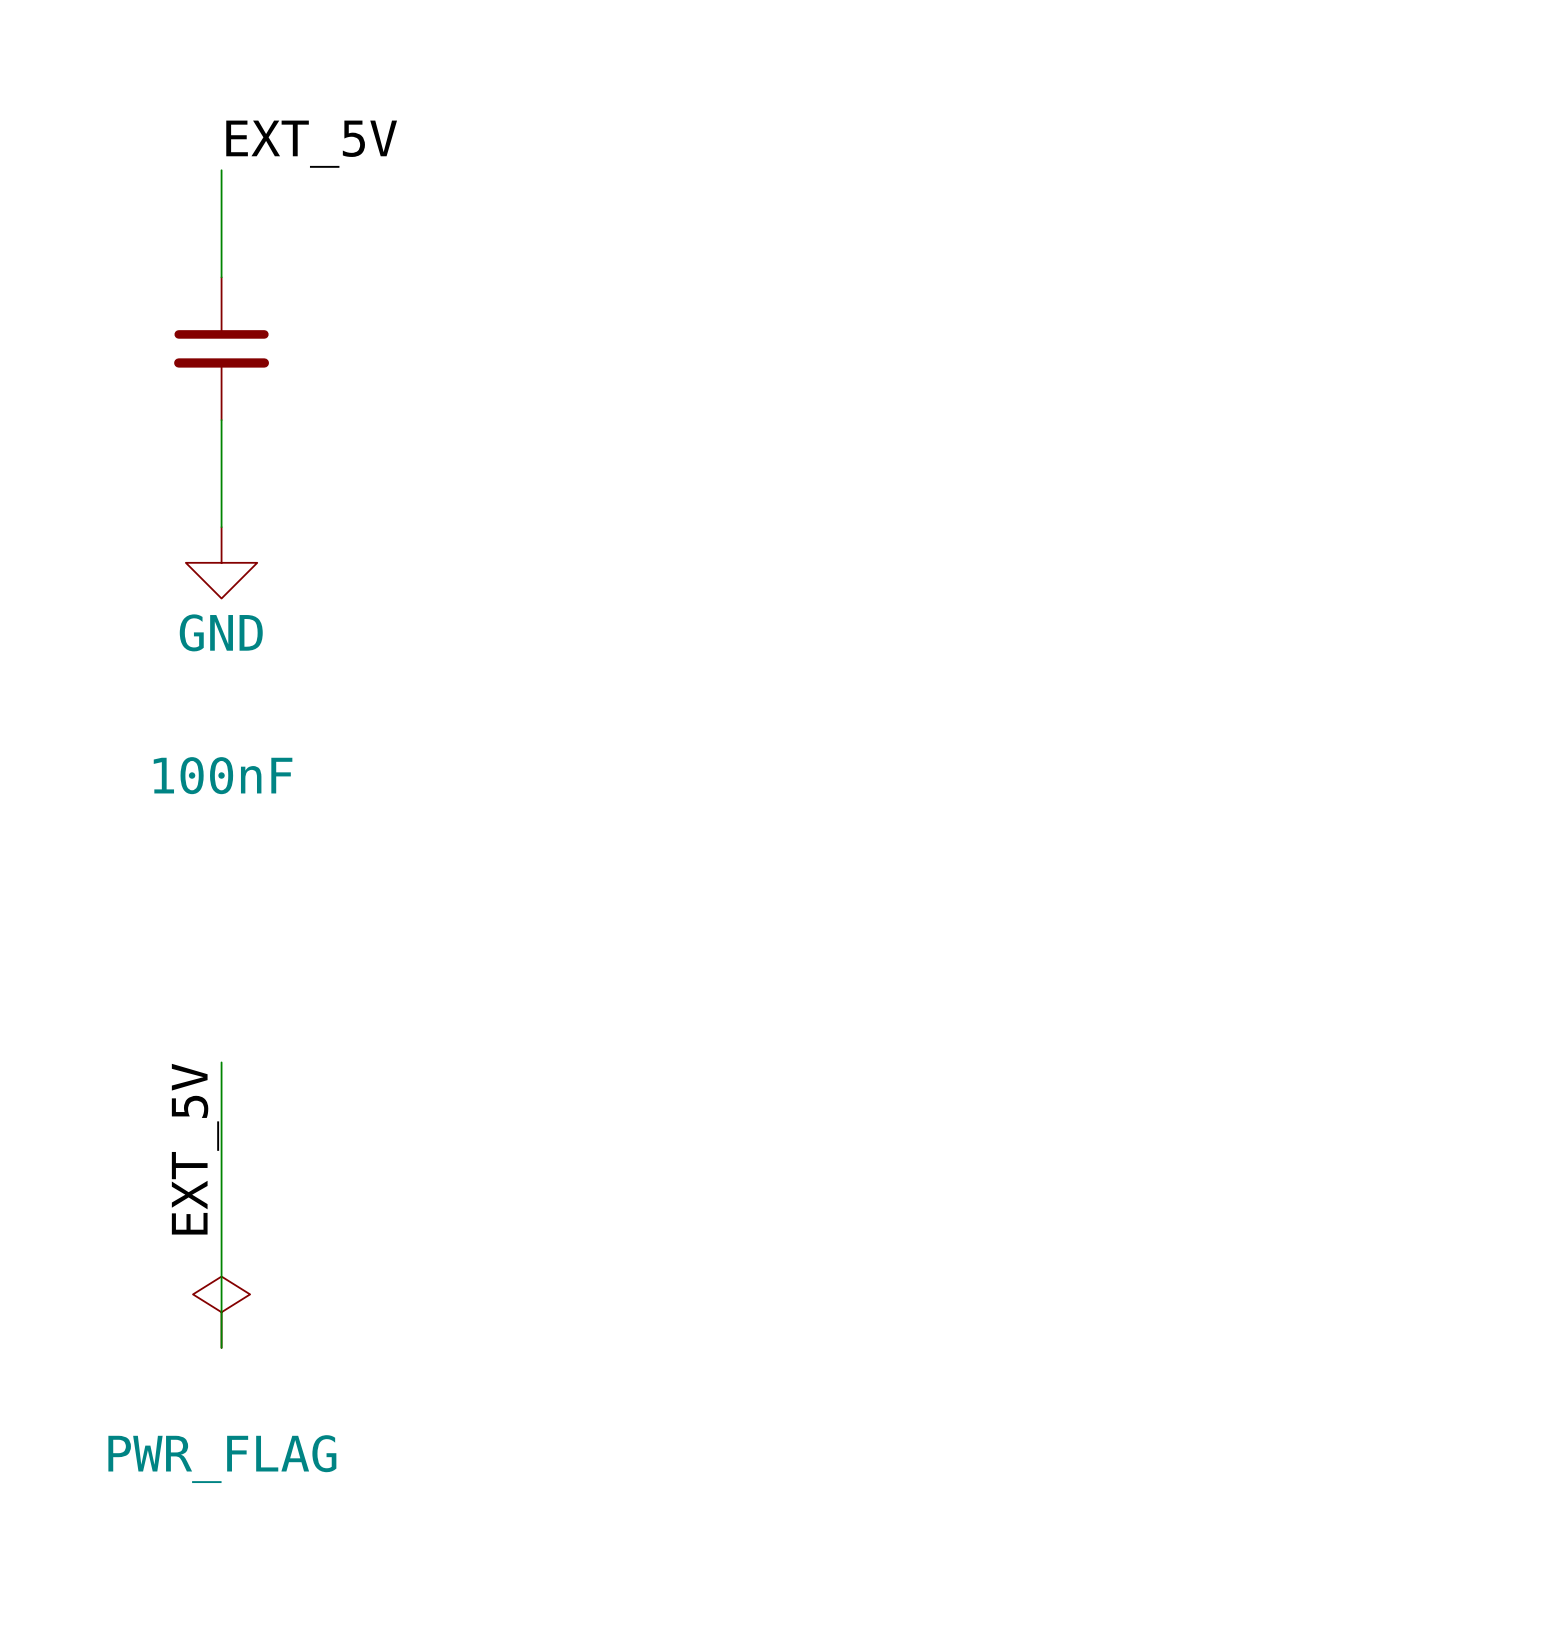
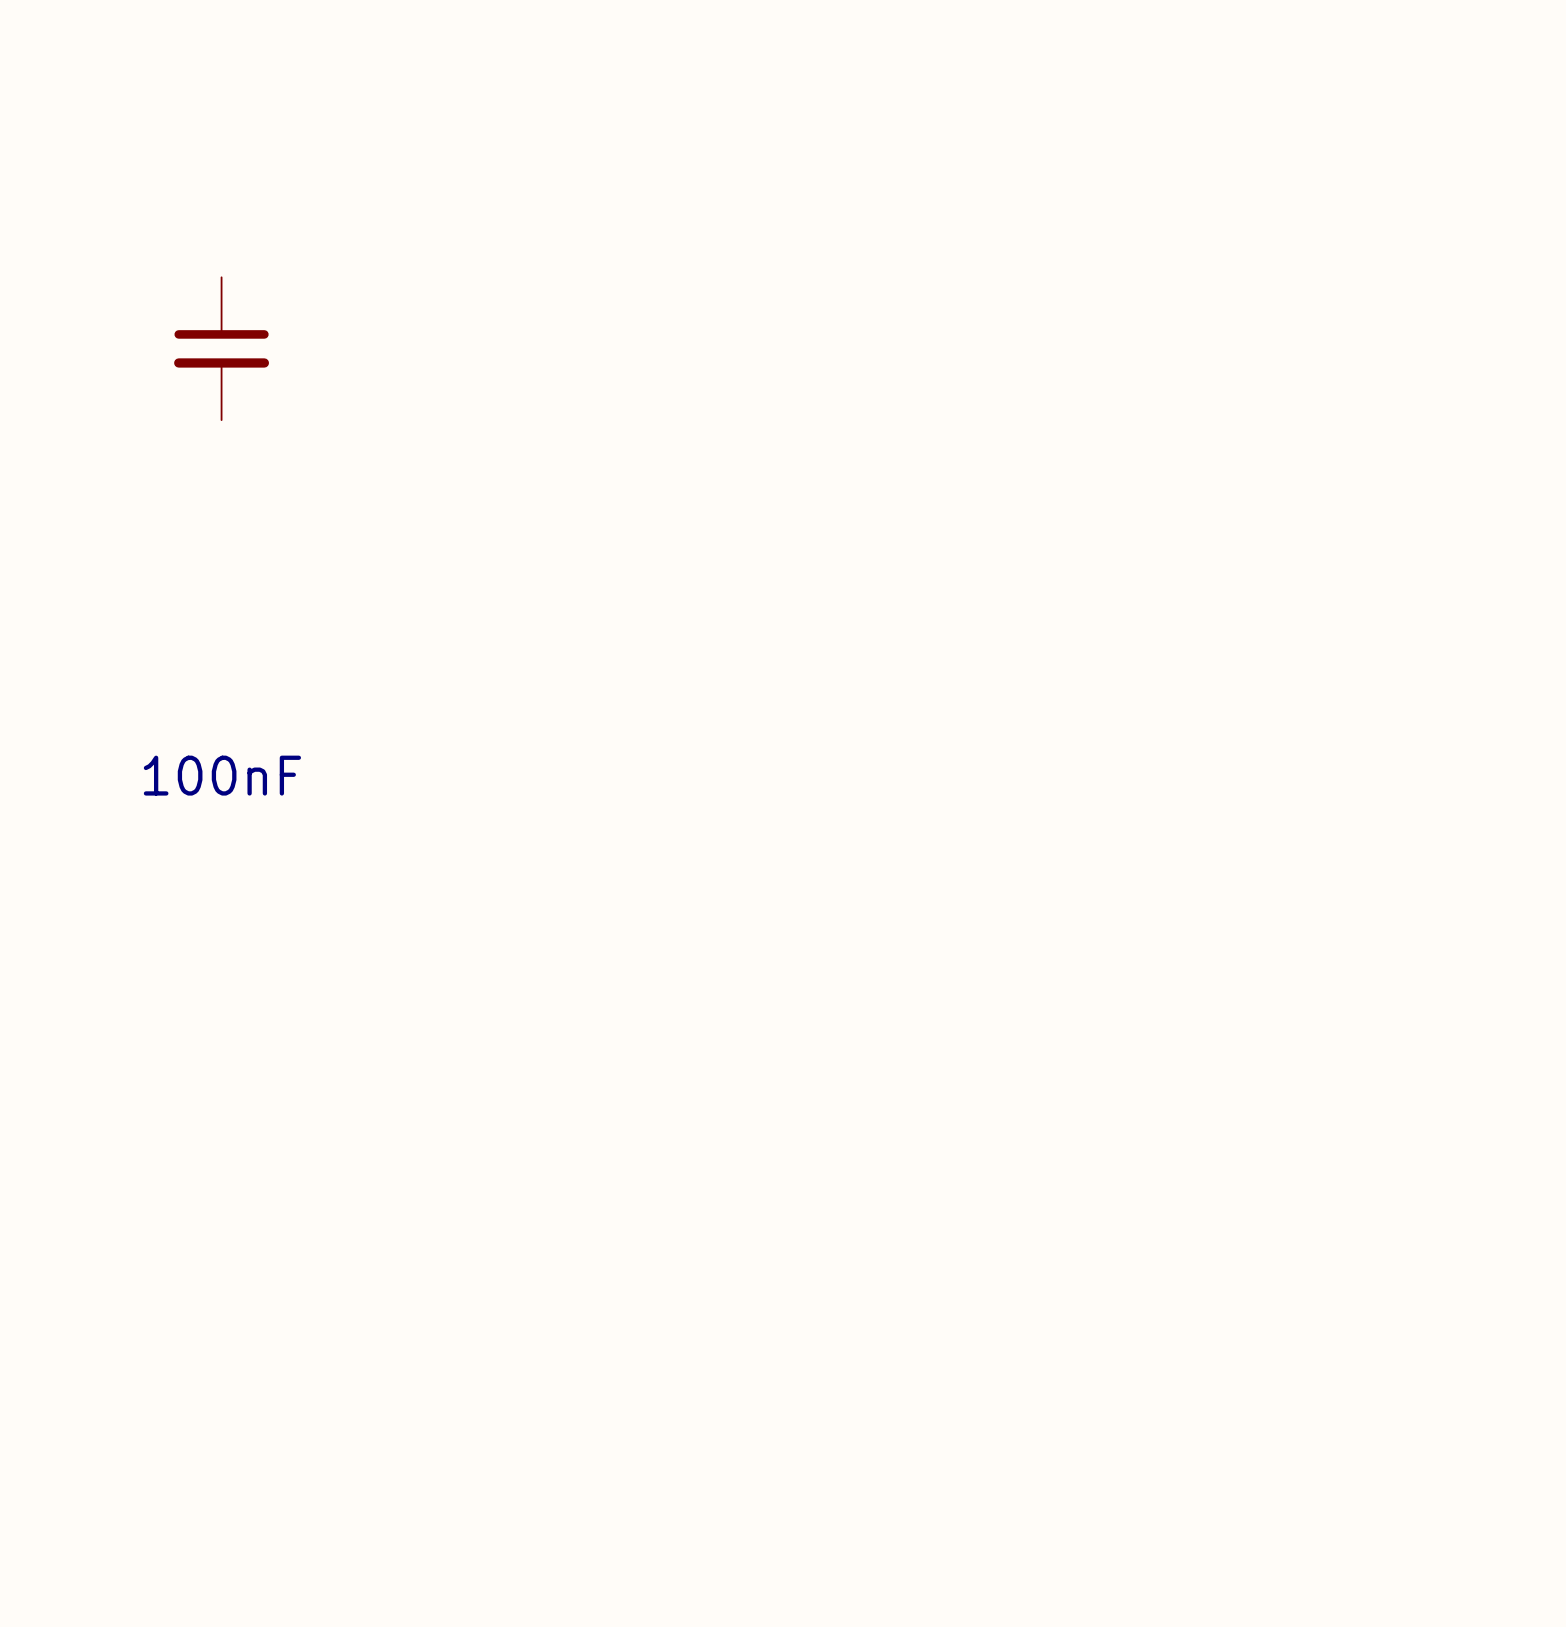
label: EXT_5V (311, 144) -> none
wire: (221, 170) (221, 277) -> none
wire: (221, 420) (221, 527) -> none
power symbol: GND (221, 562) -> none
wire: (221, 1062) (221, 1347) -> none
label: EXT_5V (195, 1149) -> none
power symbol: PWR_FLAG (221, 1312) -> none

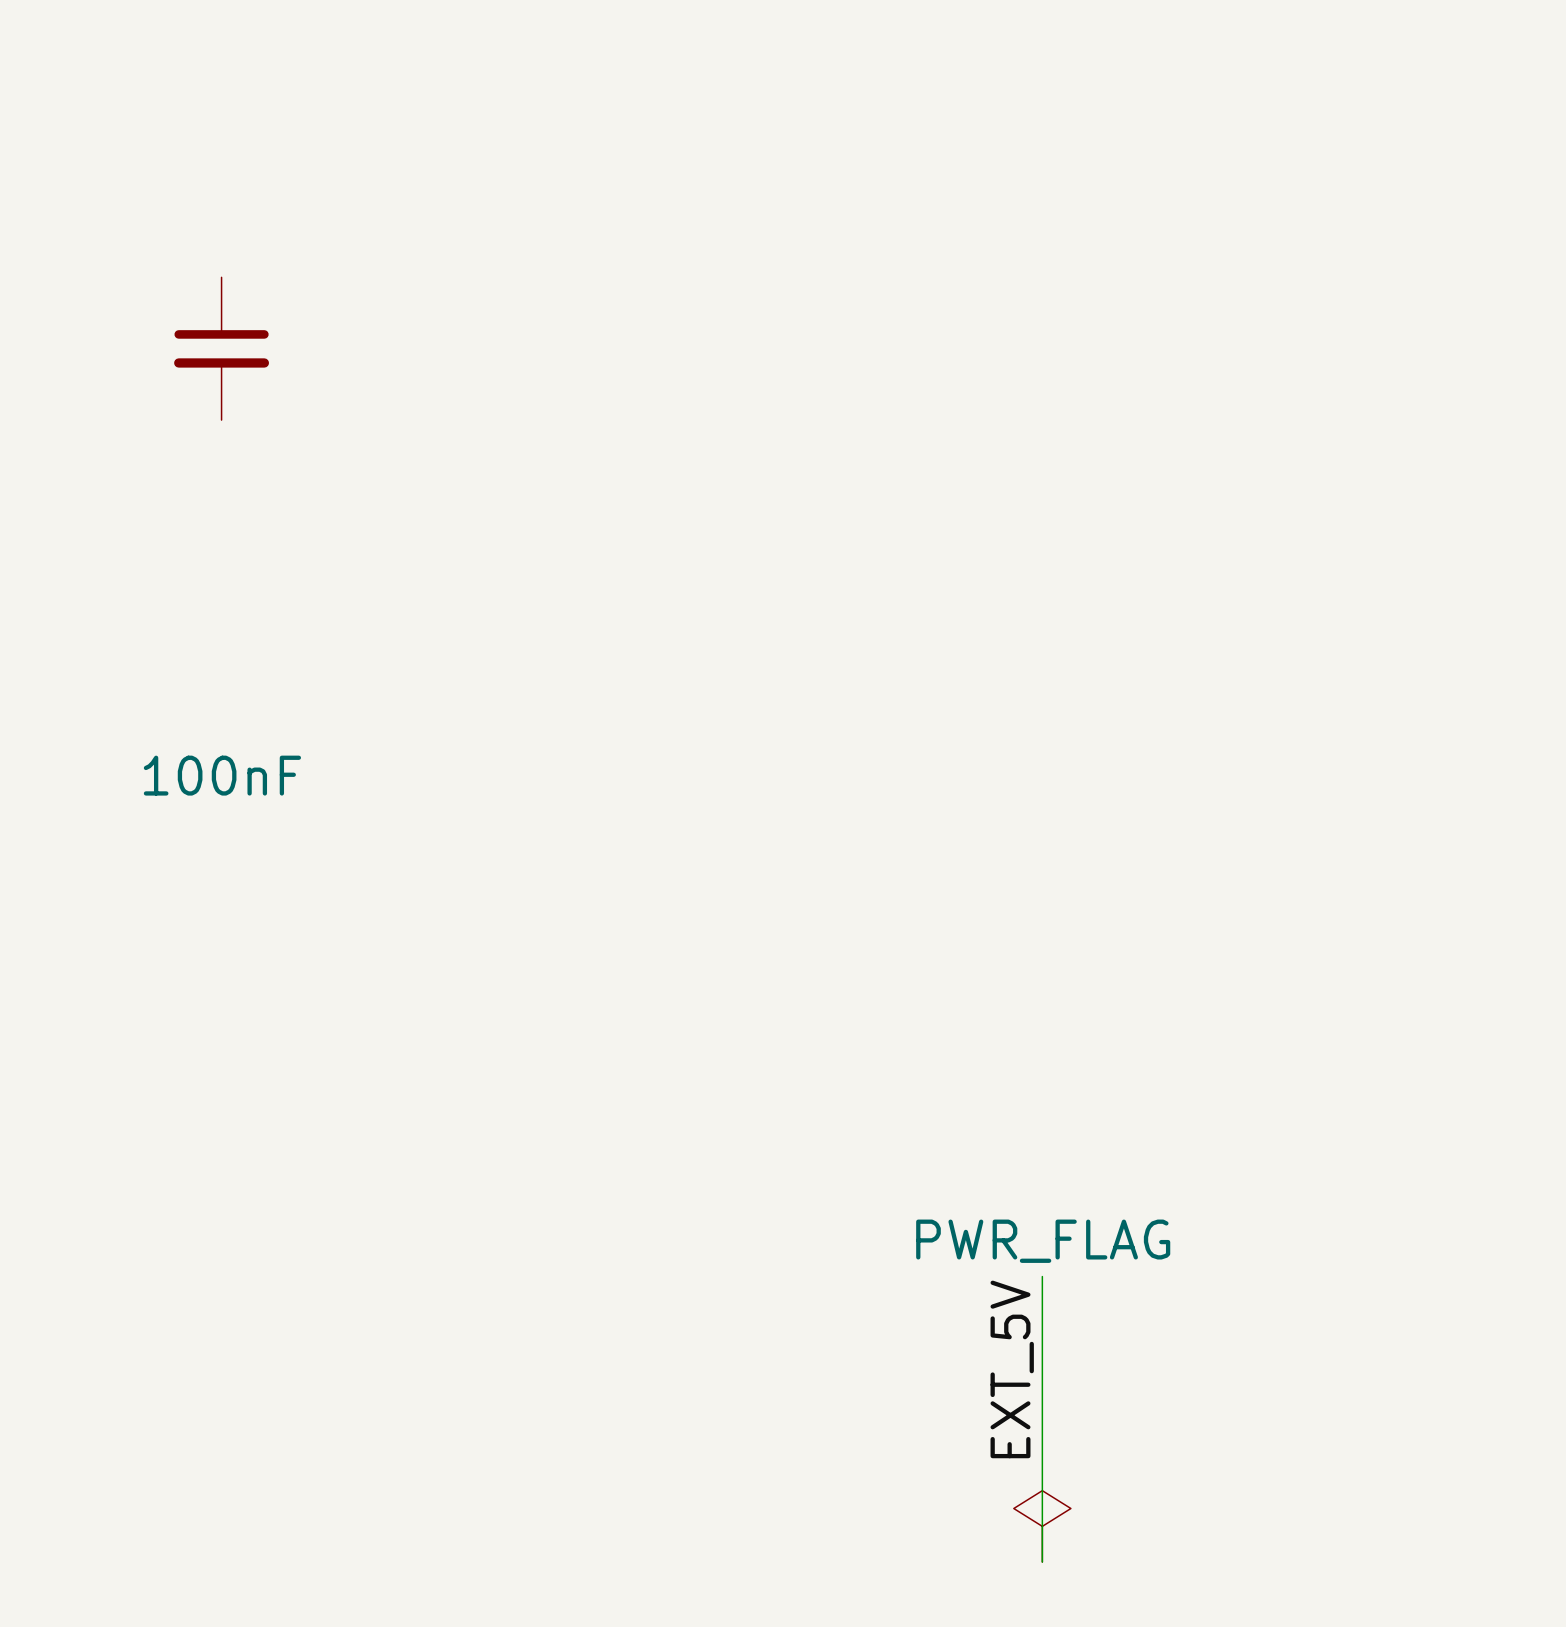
wire: none -> (1042, 1276) (1042, 1562)
label: none -> EXT_5V (1012, 1369)
power symbol: none -> PWR_FLAG (1042, 1526)

